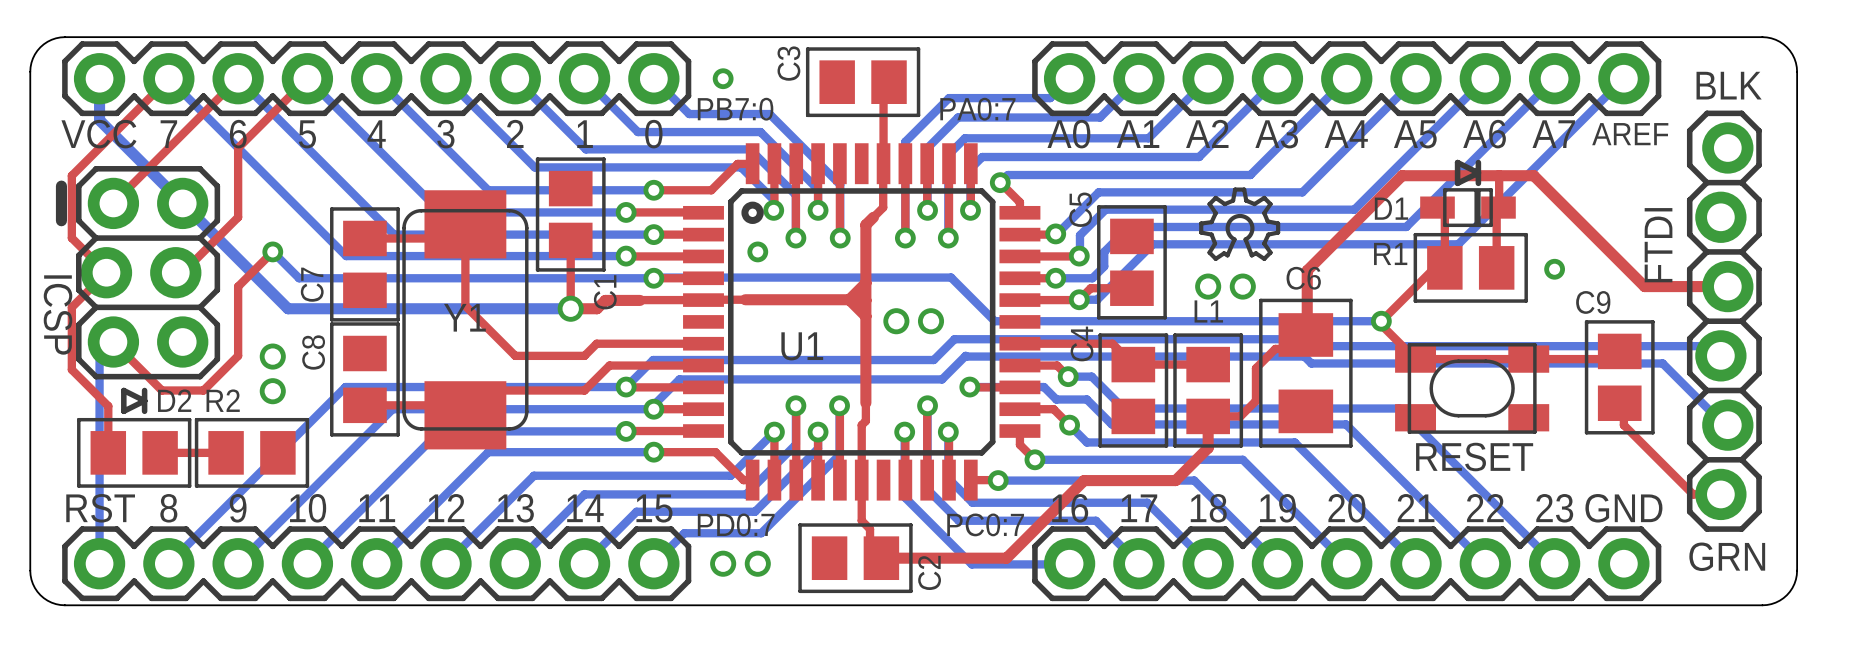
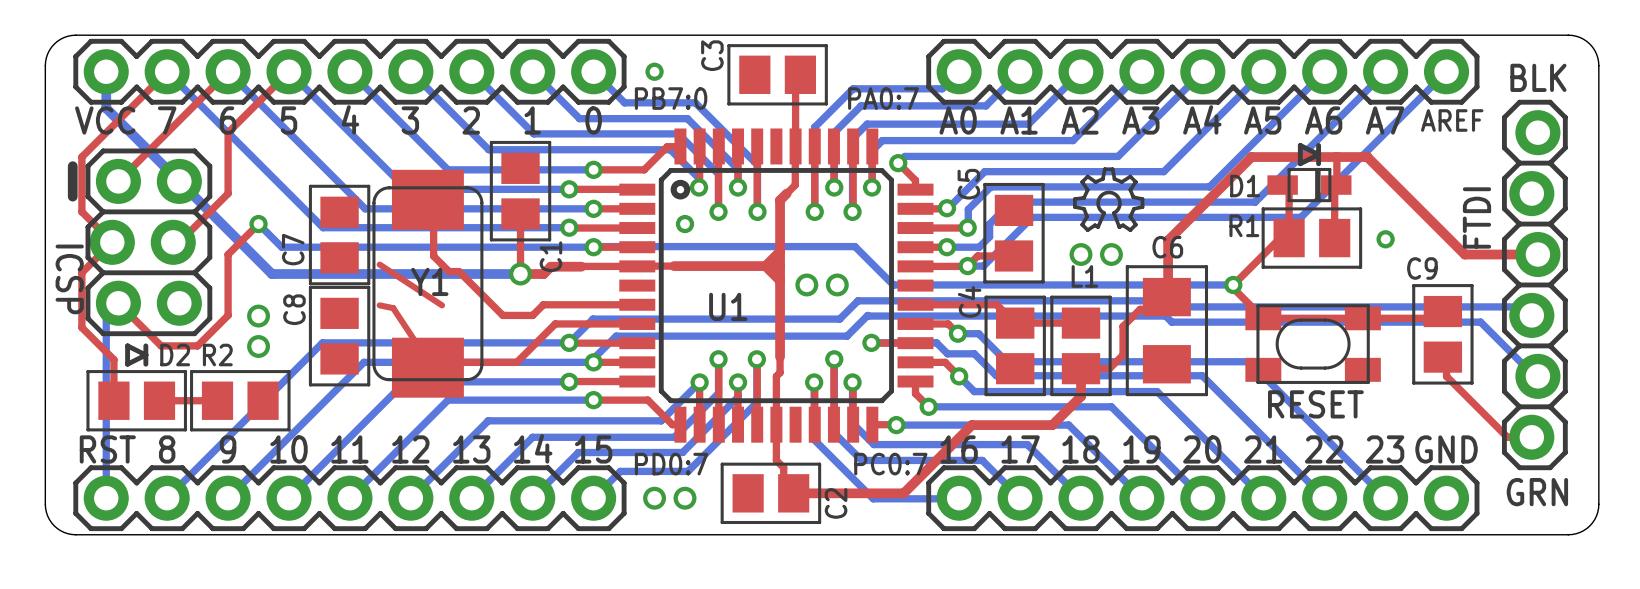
top track: (364, 238) (451, 238) (465, 224) (465, 305) (515, 355) (550, 355) -> (433, 199) (433, 256) (449, 271) (458, 271) (502, 315)
top track: none -> (379, 264) (442, 305)
top track: (610, 365) (584, 390) (480, 390) (480, 400) (465, 415) (455, 405) (364, 405) -> (555, 323) (516, 362) (435, 362) (433, 364) (424, 355) (393, 308) (379, 305)

